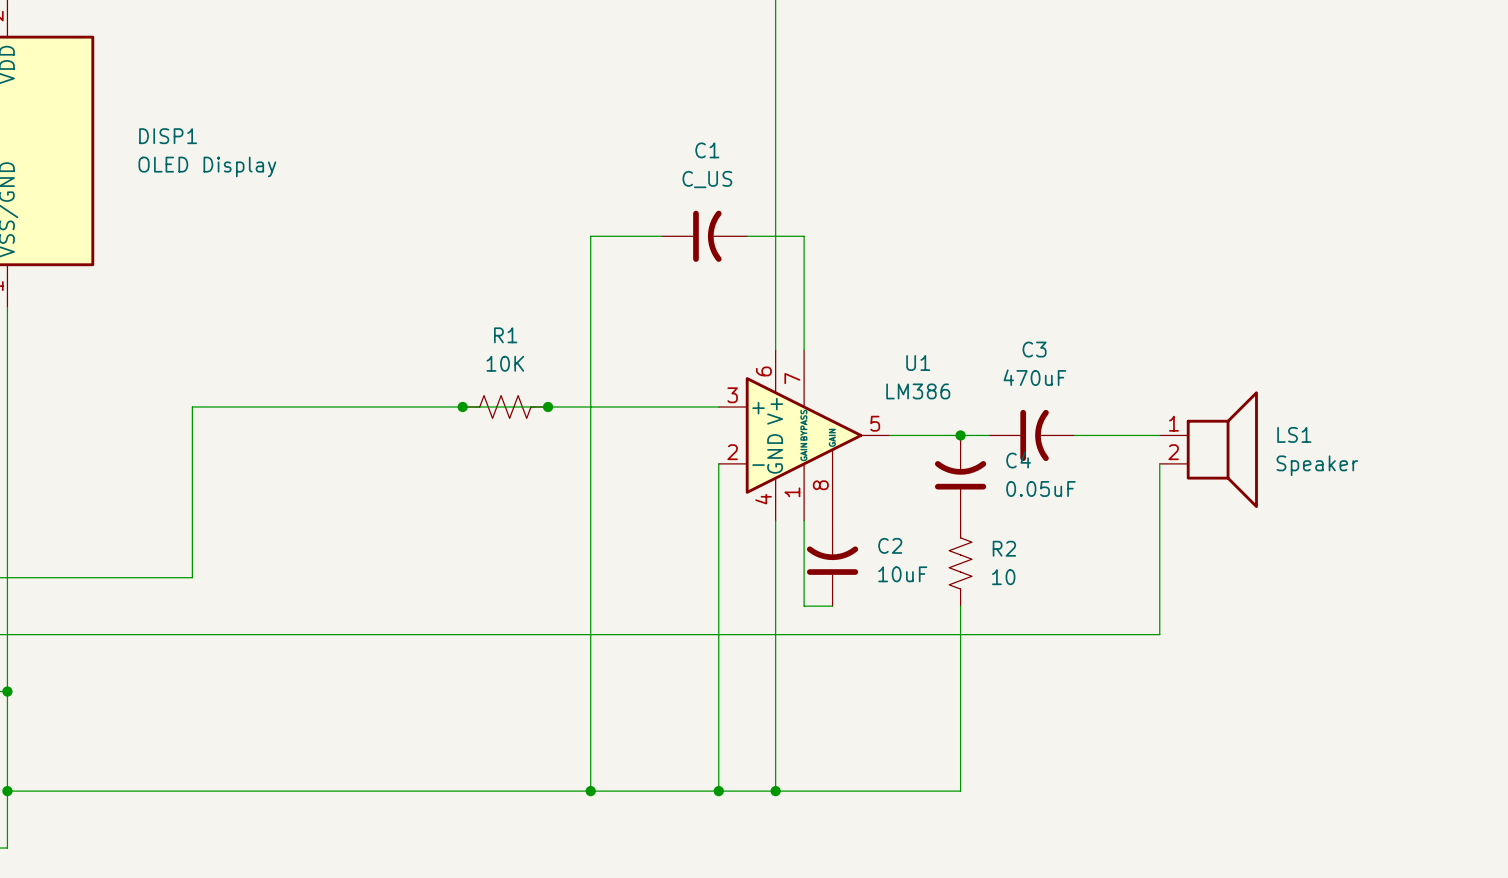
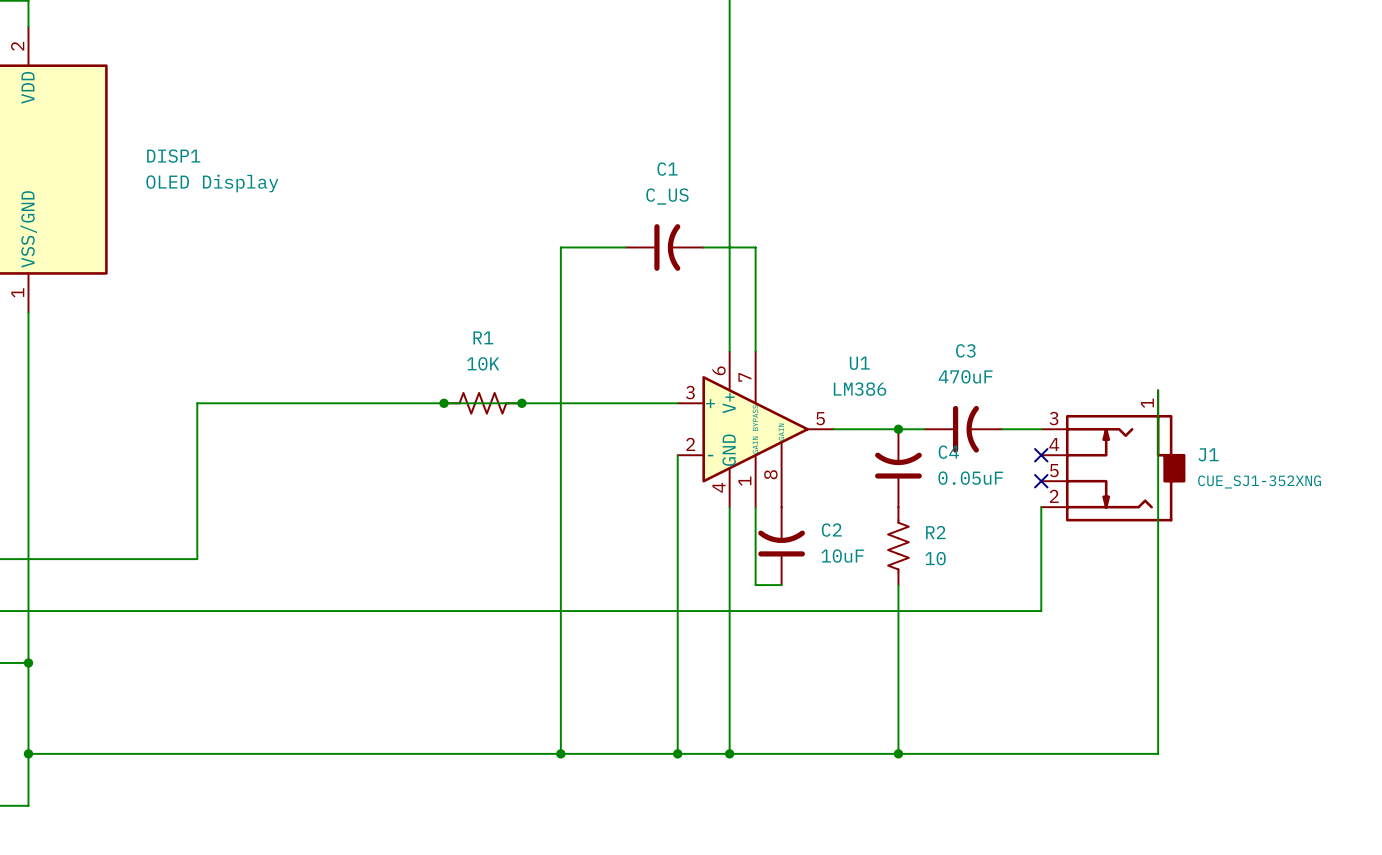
wire: none -> (1158, 390) (1158, 753) (898, 753)
LS1: Speaker (1208, 449) -> none
no-connect mark: none -> (1041, 455)
wire: (1159, 463) (1159, 634) (1117, 634) -> (1041, 507) (1041, 611)
J1: none -> CUE_SJ1-352XNG (1113, 455)
no-connect mark: none -> (1041, 481)
junction: none -> (898, 753)

